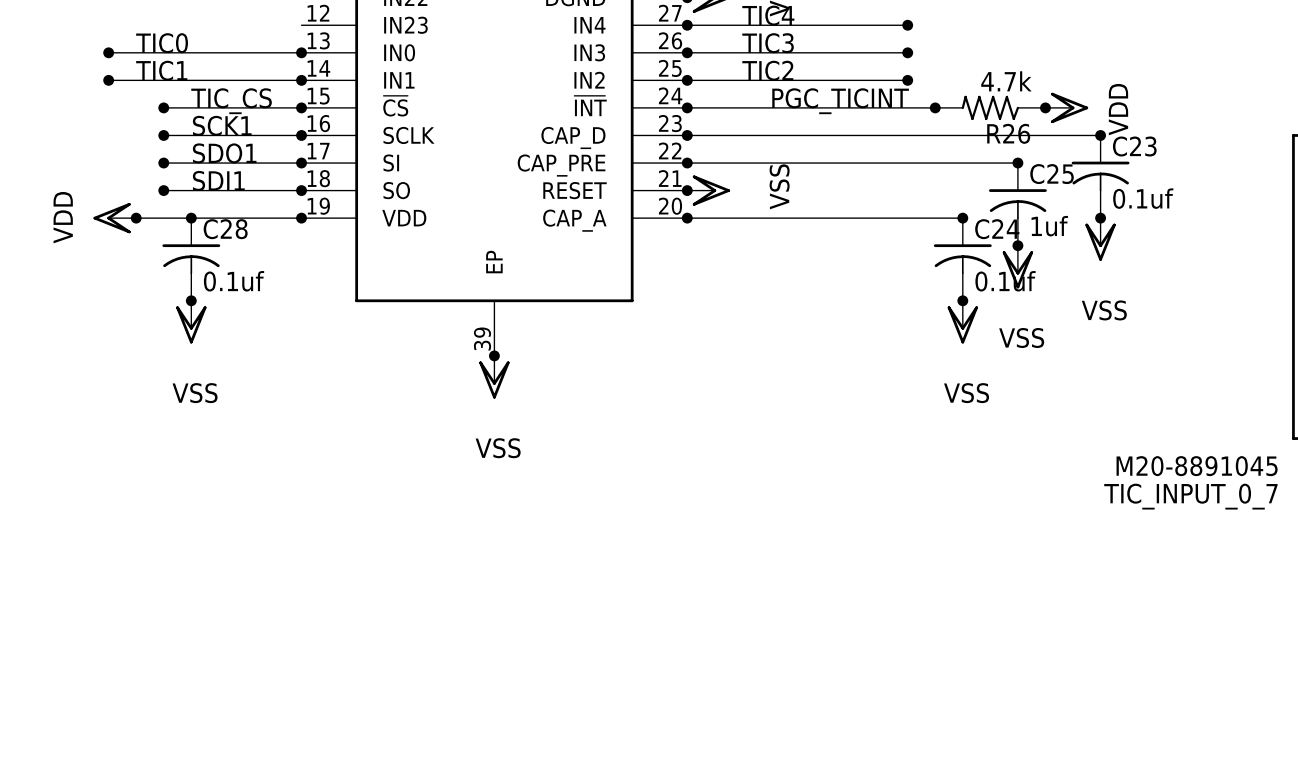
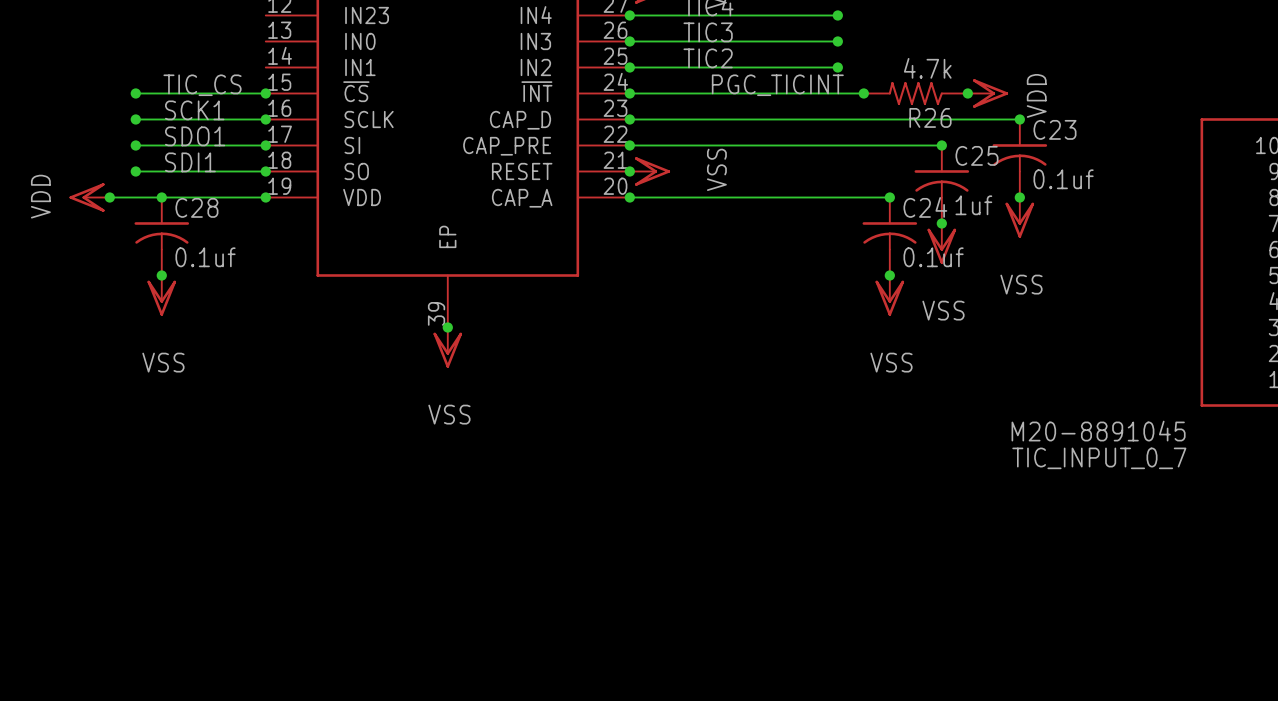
label: TIC0 (162, 43) -> none
wire: (108, 52) (301, 52) -> none
junction: (108, 52) -> none
junction: (301, 52) -> none
label: TIC1 (161, 70) -> none
wire: (108, 80) (301, 80) -> none
junction: (108, 80) -> none
junction: (301, 80) -> none

